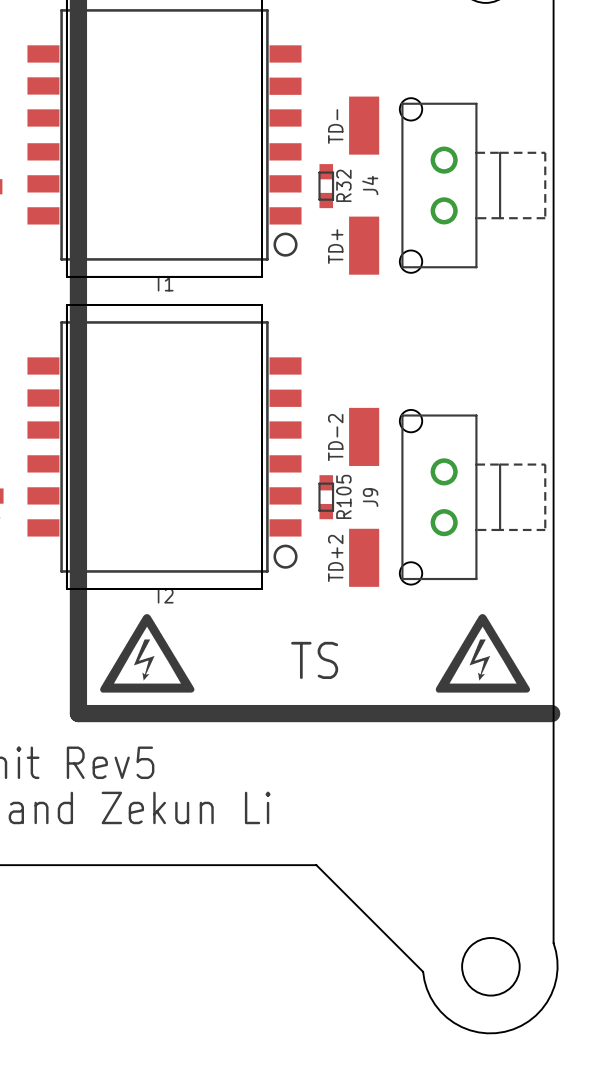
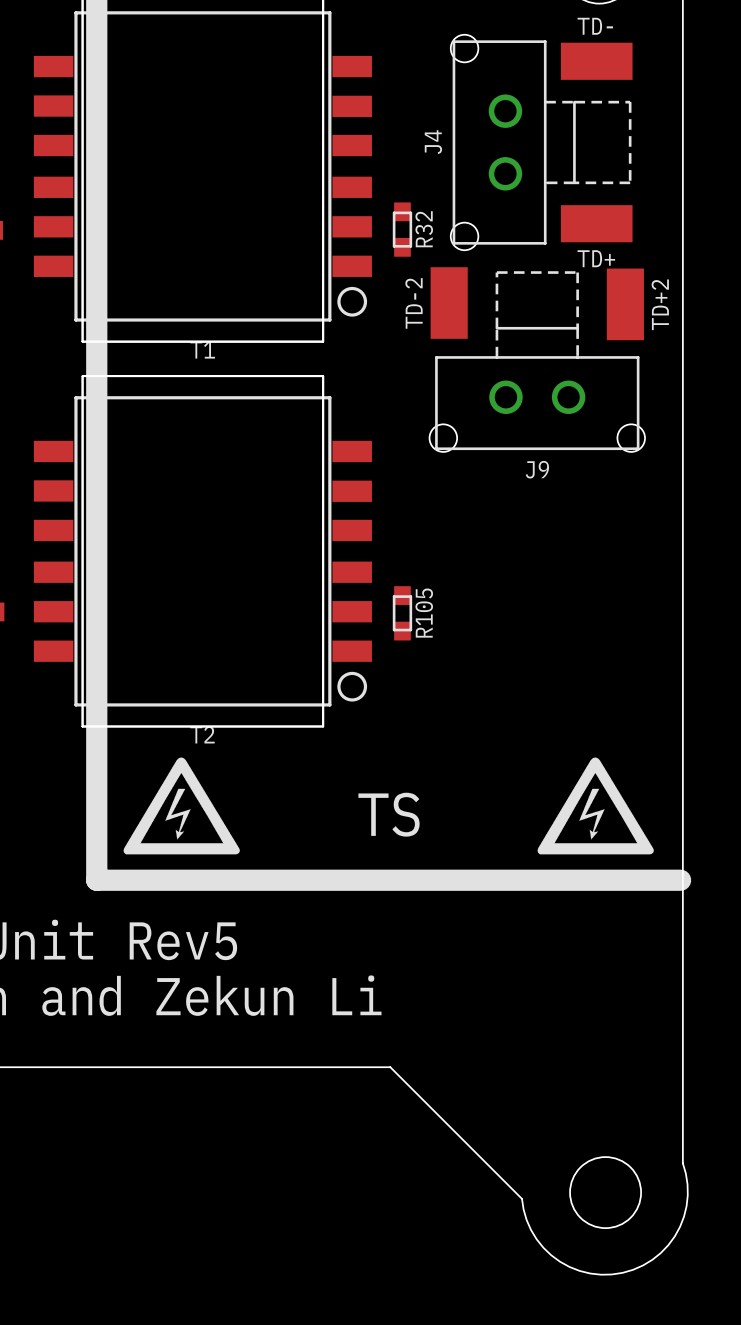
TD- rotation: 0° (364, 125) -> 90° clockwise (596, 61)
TD- position: (364, 125) -> (596, 61)
TD+: none -> (596, 223)
J4 name position: J4 (370, 185) -> J4 (433, 142)
J4 position: (473, 185) -> (541, 142)
TD+ name: TD+ (335, 246) -> TD-2 (414, 303)
TD-2: (364, 436) -> none
J9 rotation: 0° (473, 497) -> 90° counterclockwise (537, 361)
J9 position: (473, 497) -> (537, 361)
TD+2 position: (364, 557) -> (625, 304)
TD+2 name position: TD+2 (335, 558) -> TD+2 (660, 304)

